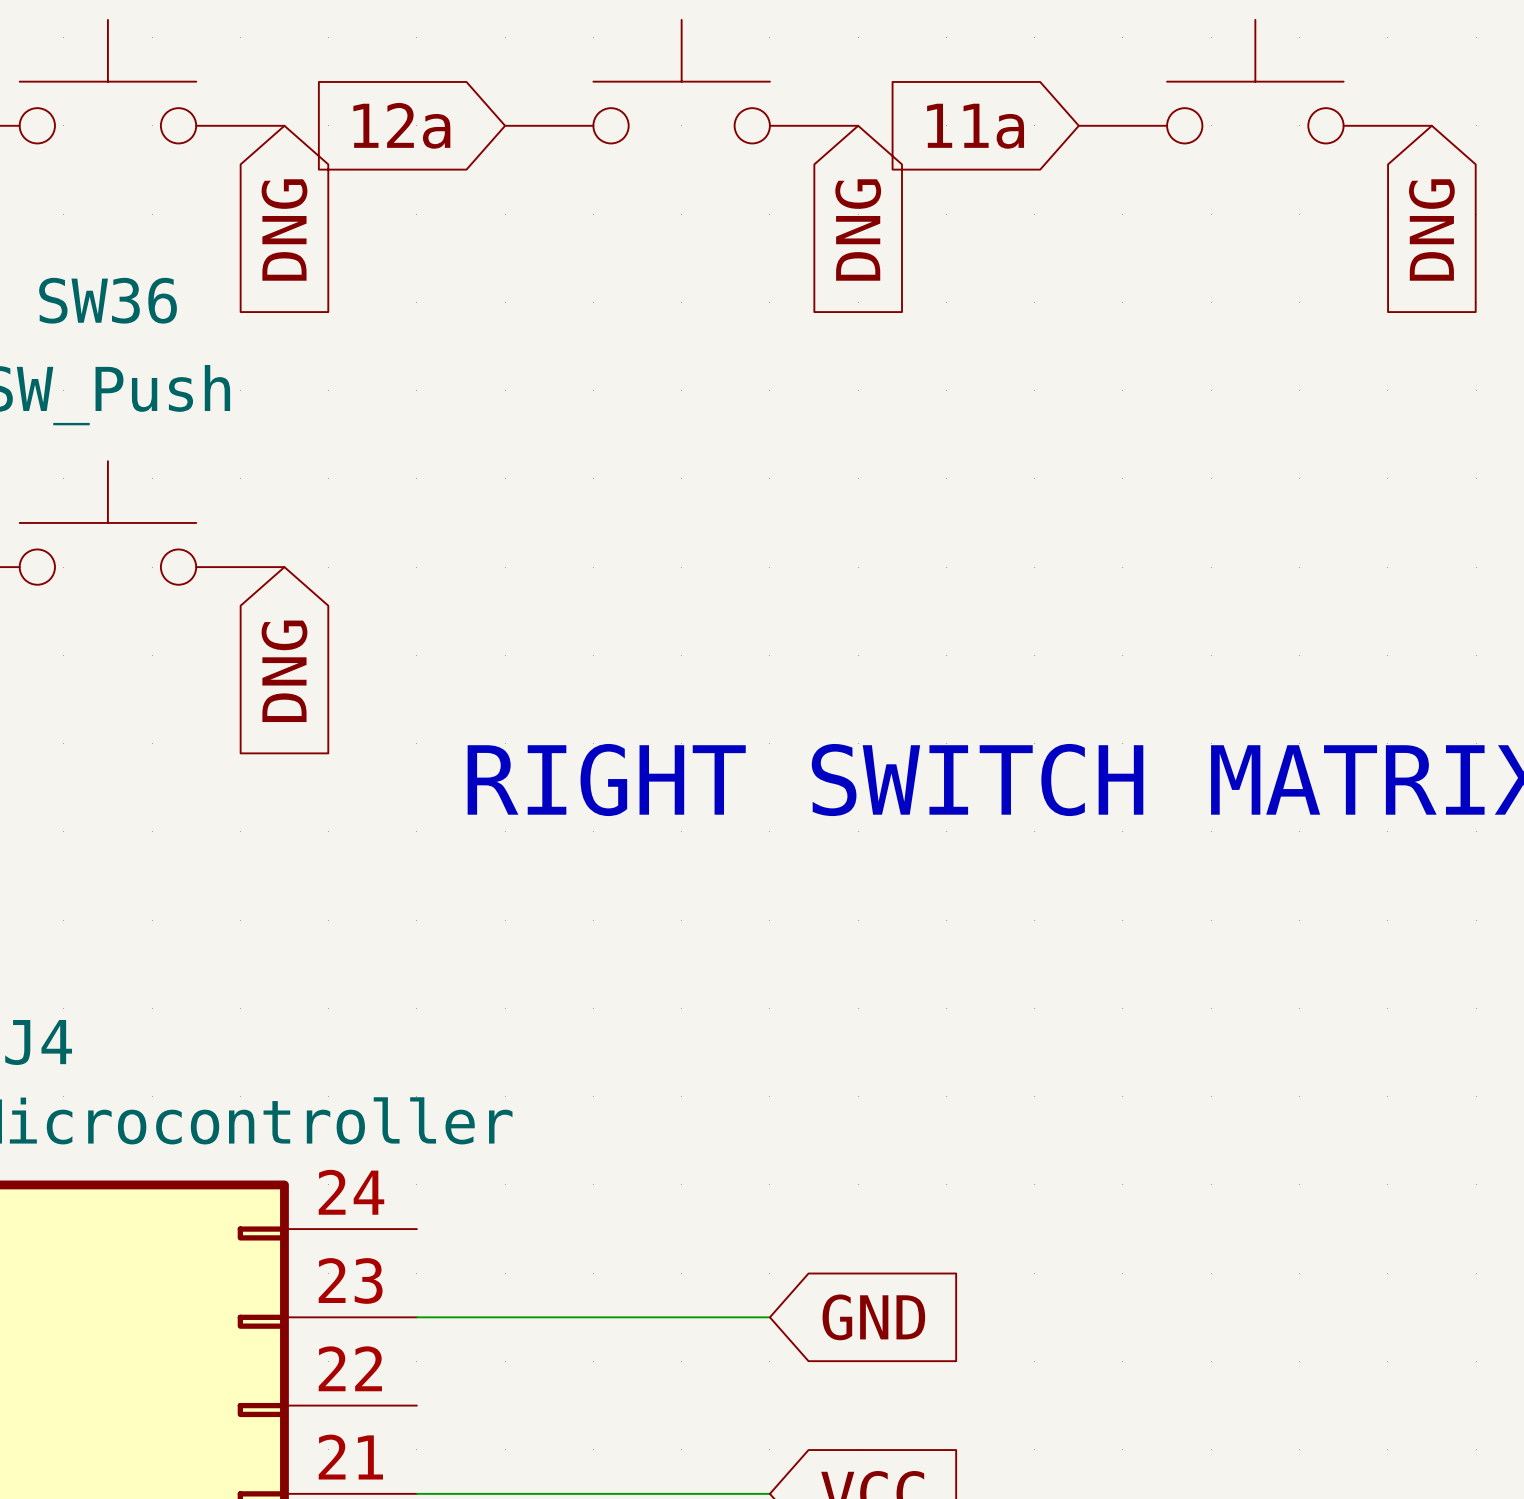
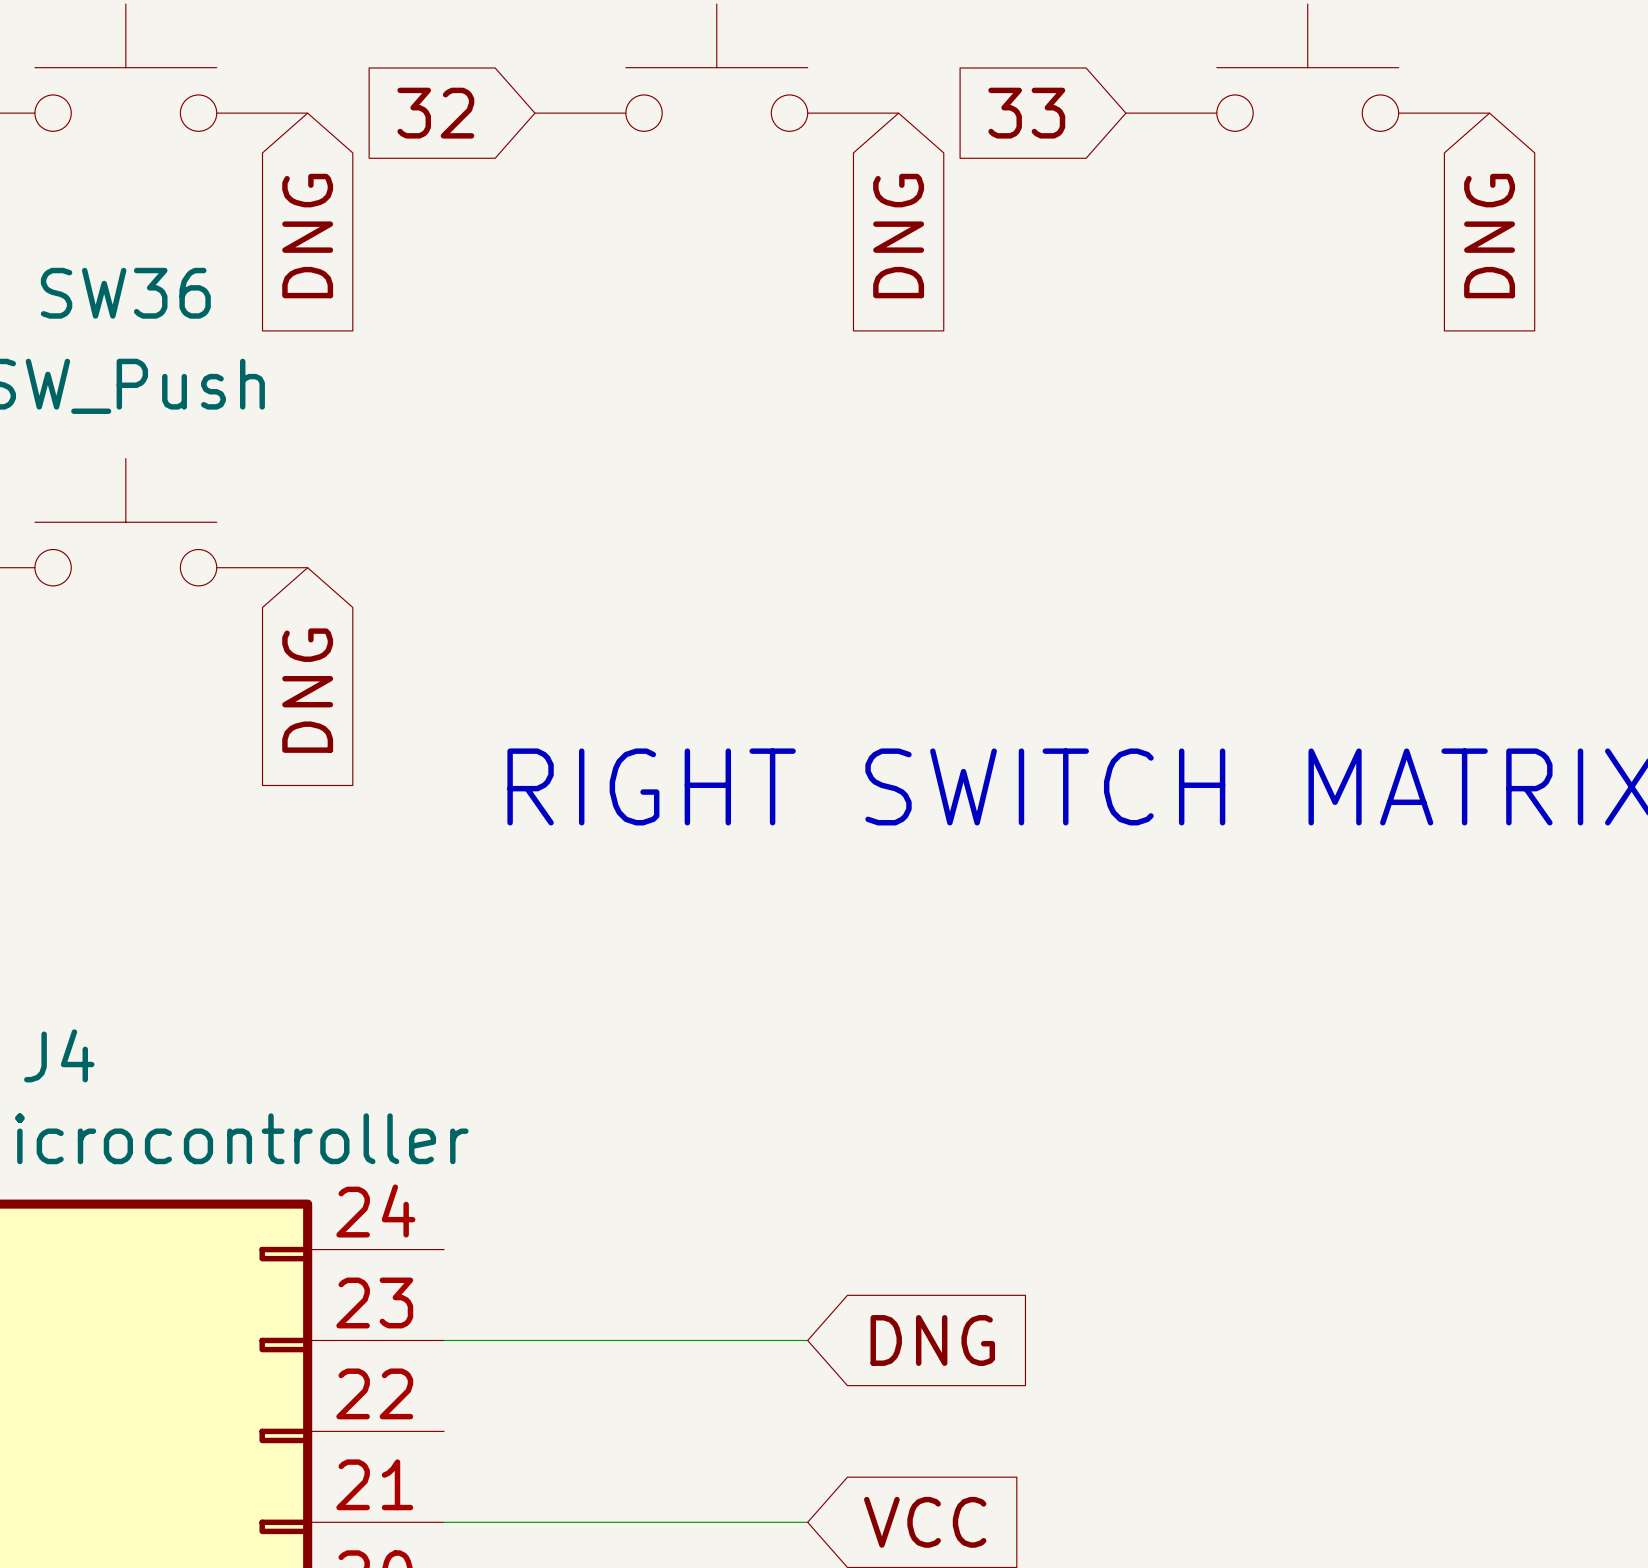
global label: 12a (401, 125) -> 32 (435, 113)
global label: 11a (975, 126) -> 33 (1026, 113)
global label: GND (873, 1317) -> DNG (932, 1340)

